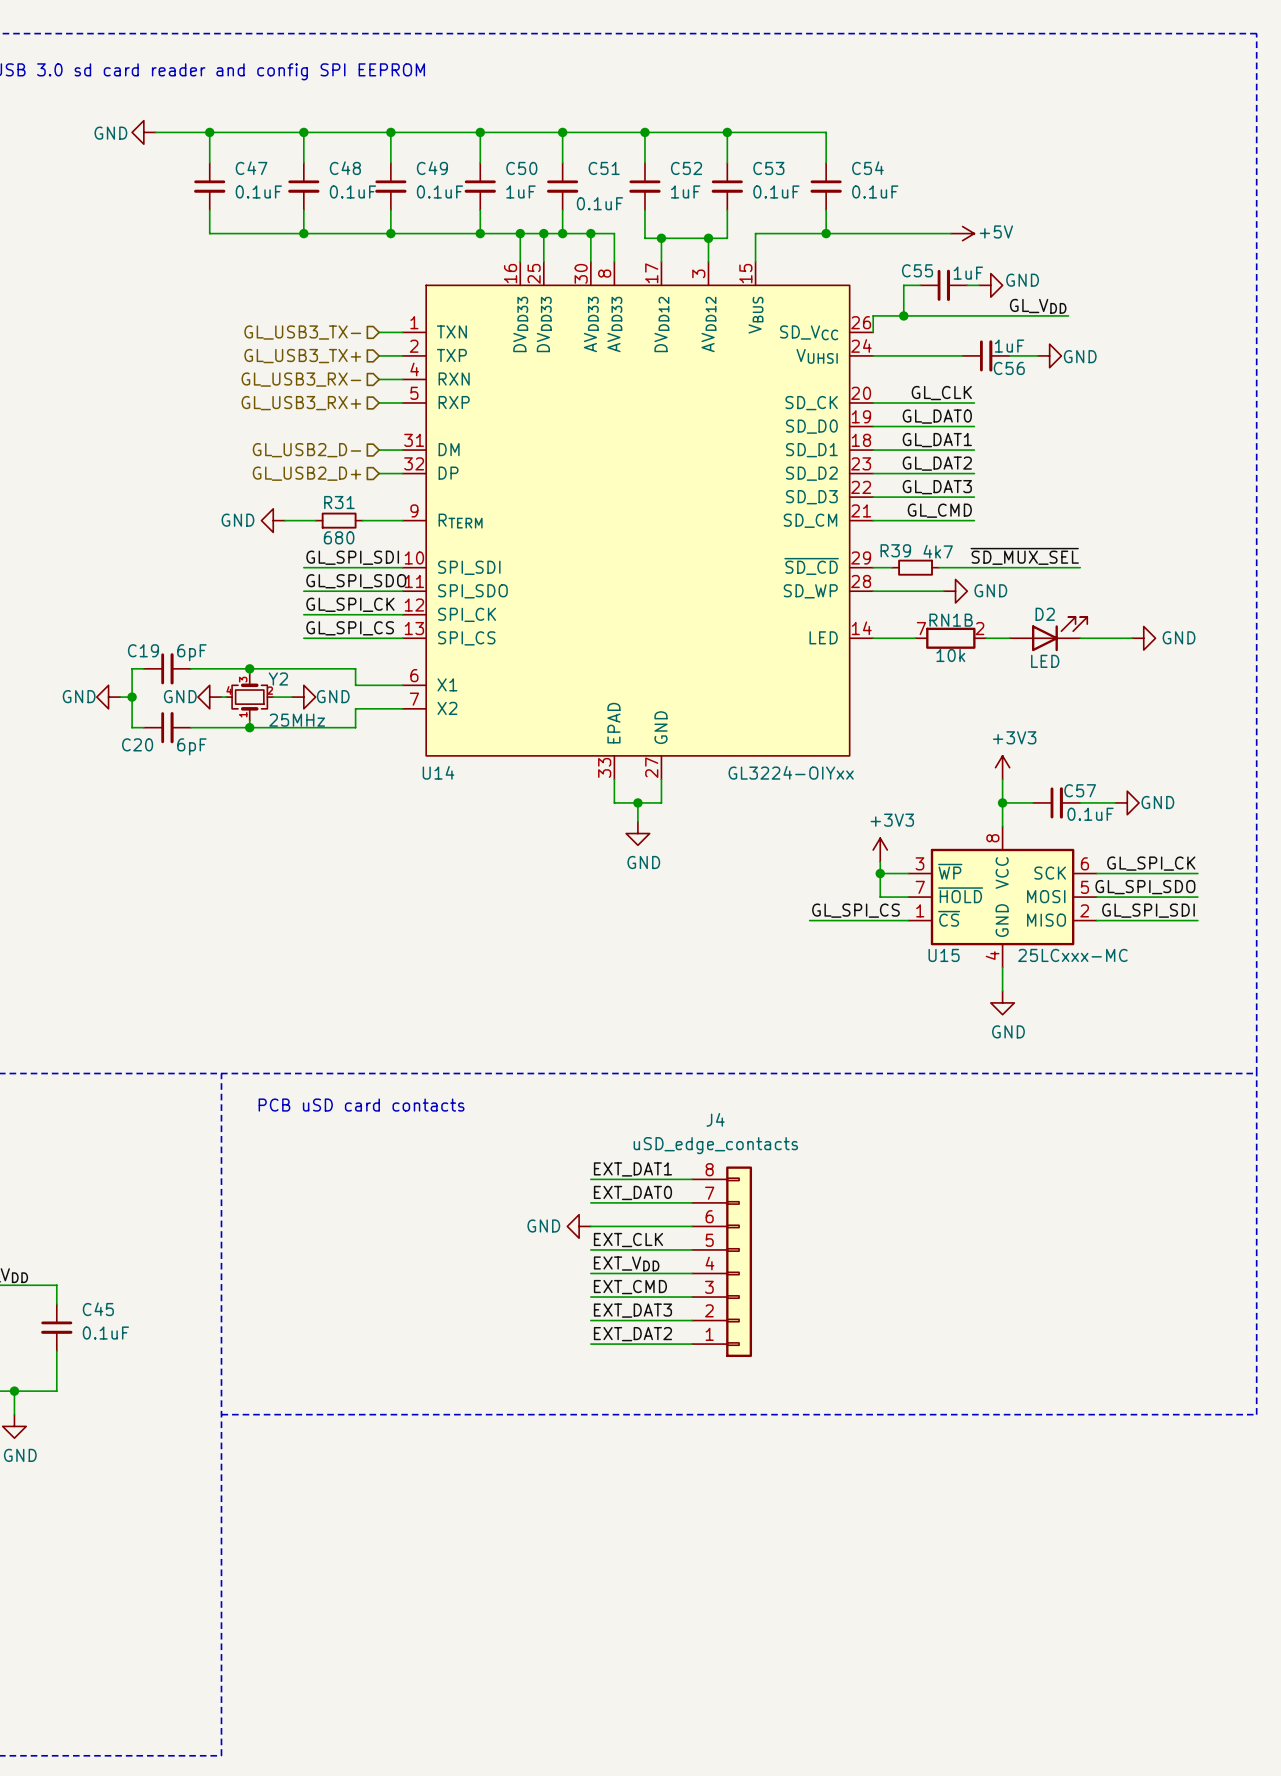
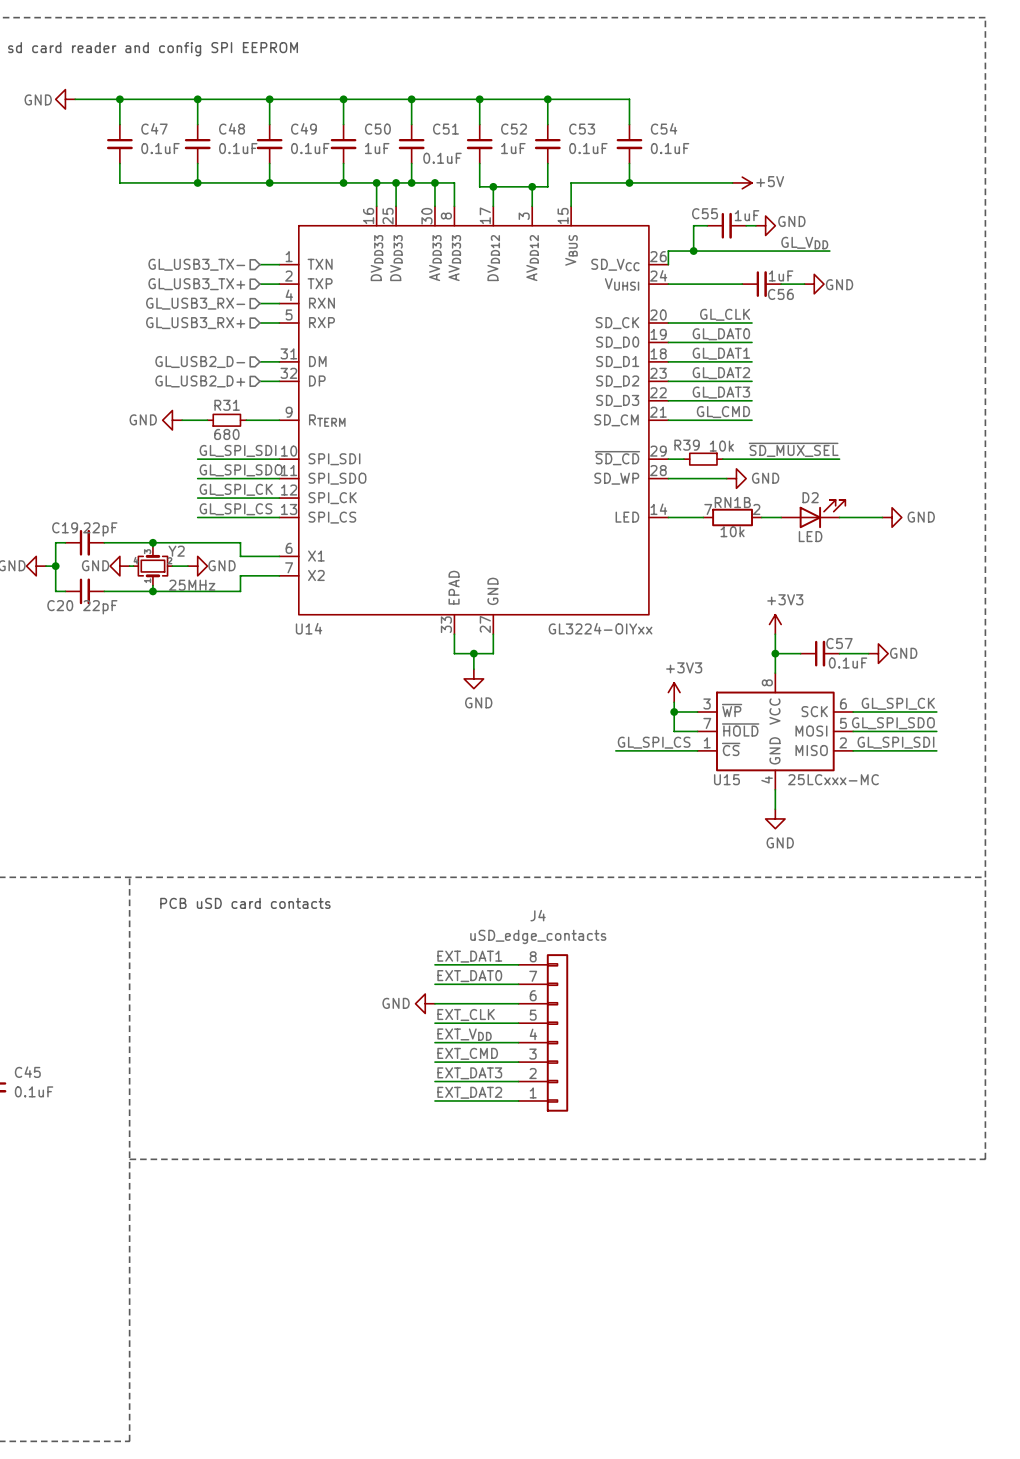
R39 value: 4k7 (938, 551) -> 10k (721, 446)
C19 value: 6pF (191, 652) -> 22pF (100, 529)
C20 value: 6pF (191, 746) -> 22pF (100, 607)

